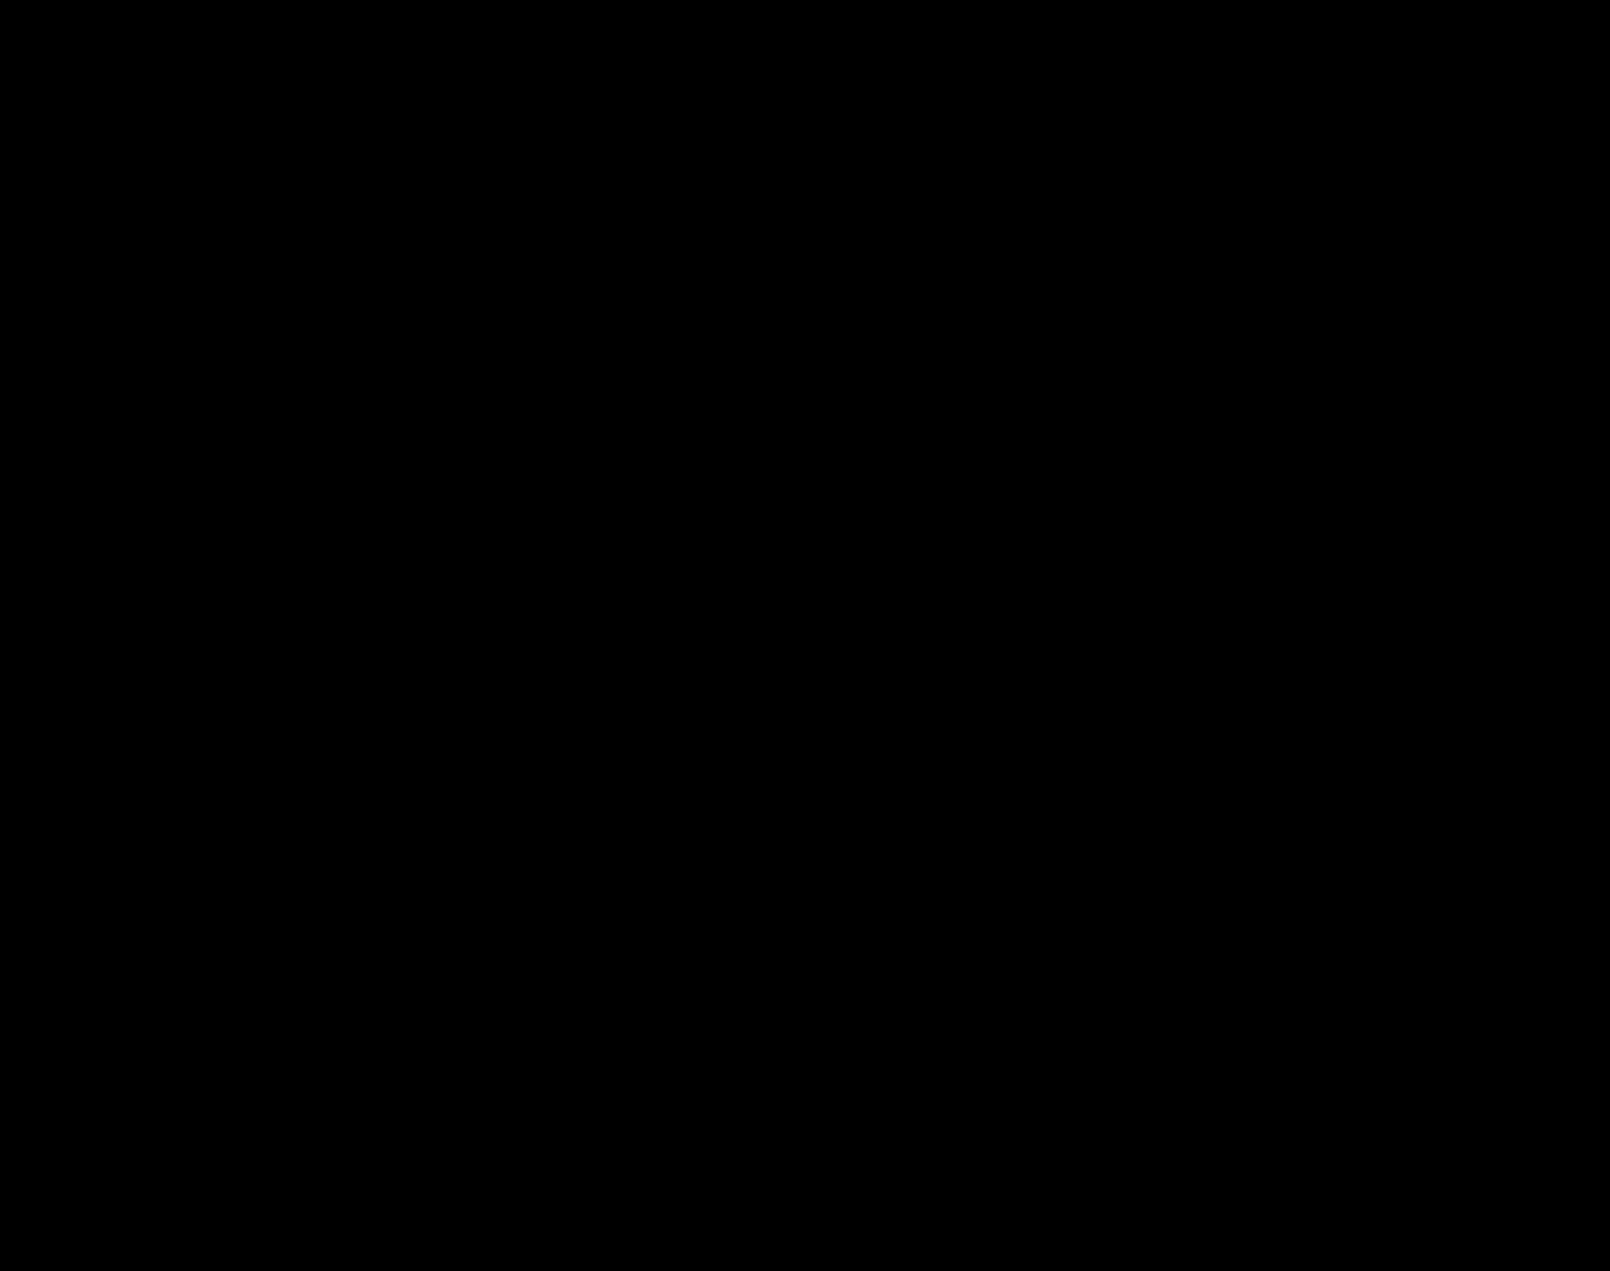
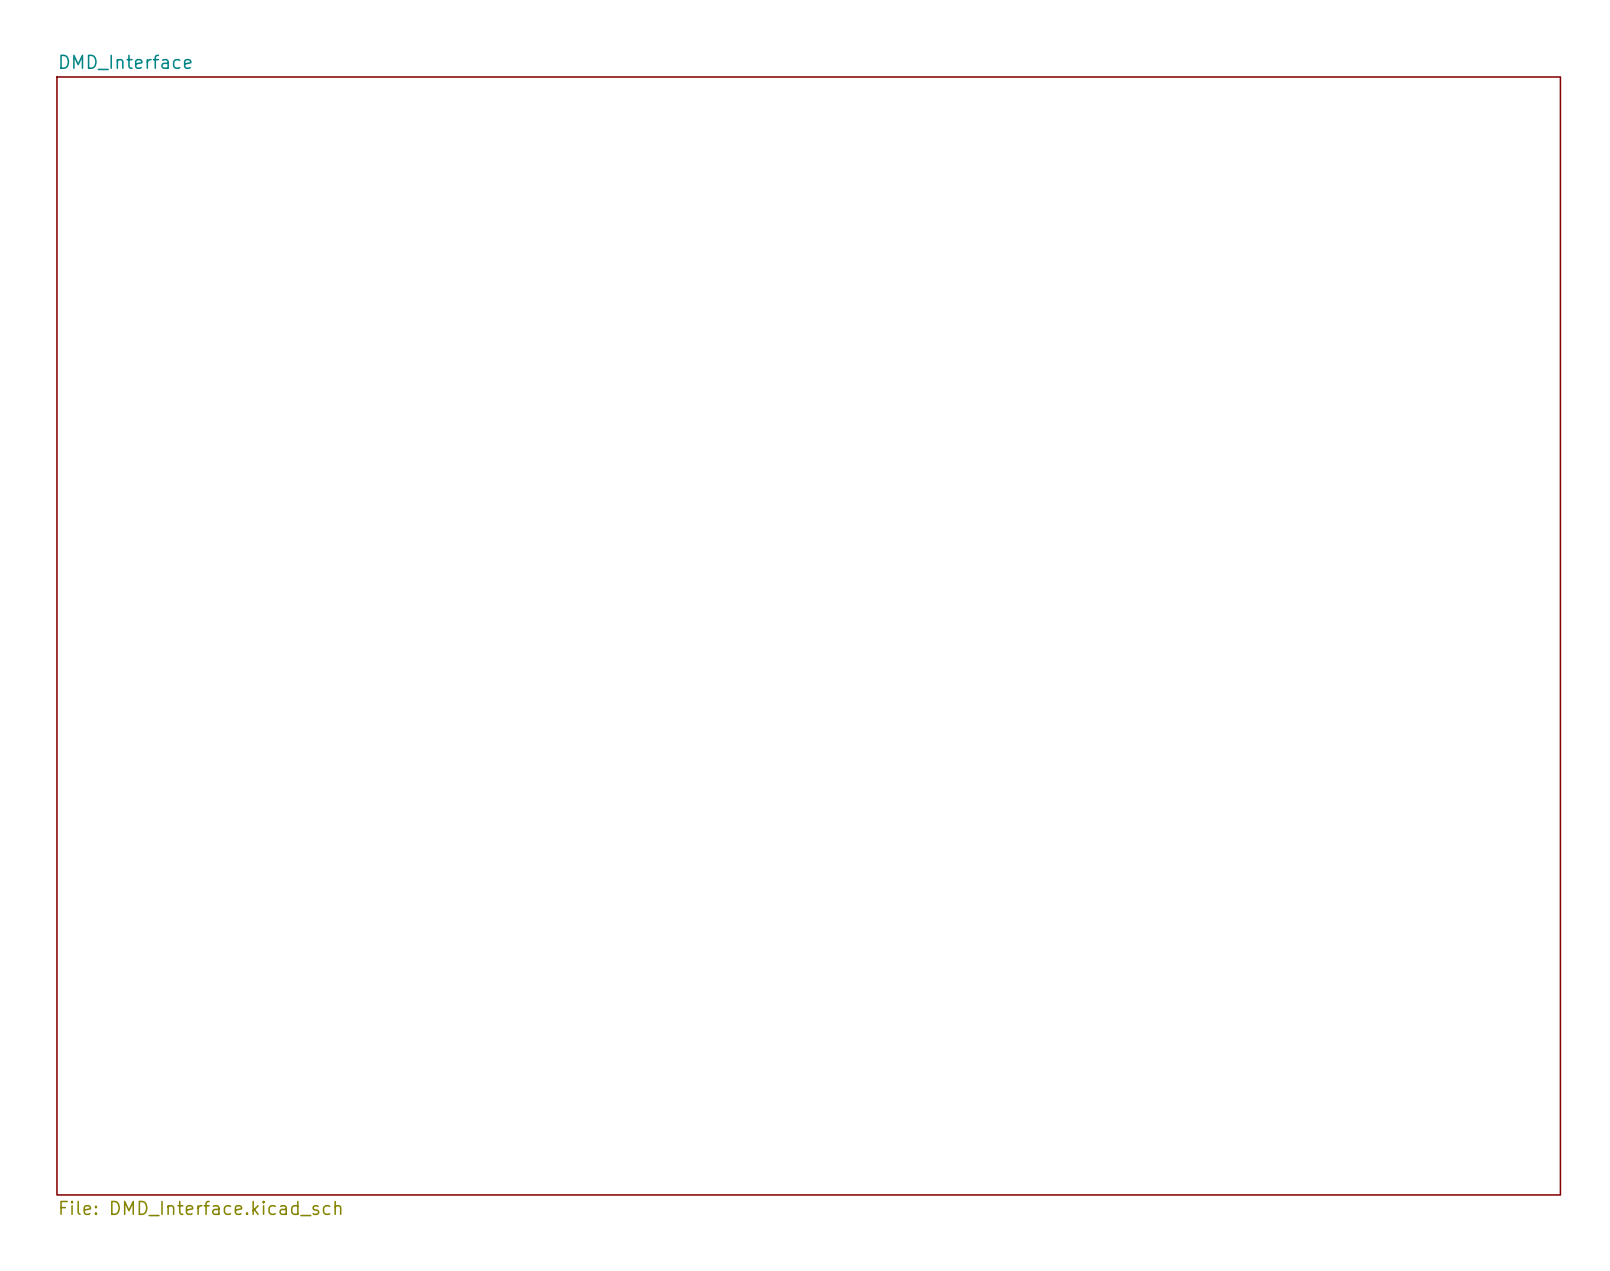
sheet DMD_Interface: none -> File: DMD_Interface.kicad_sch (808, 635)

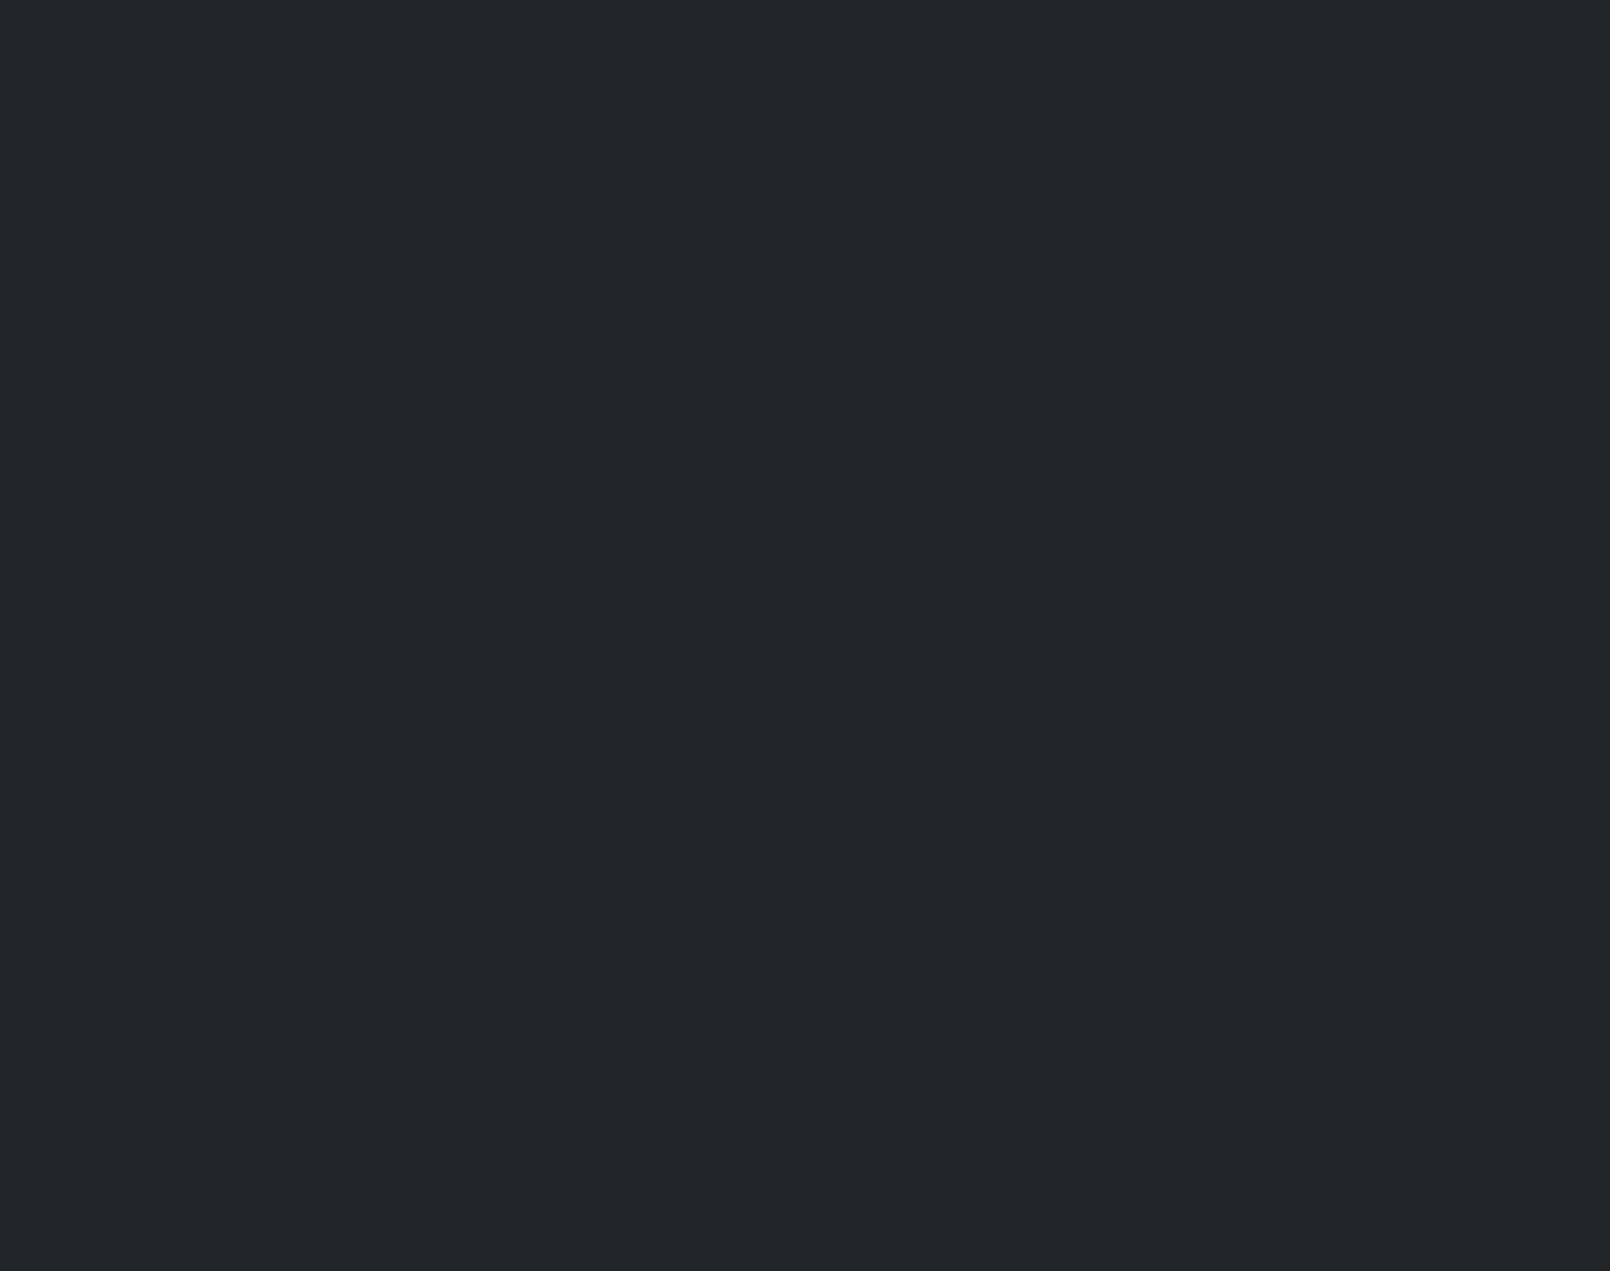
sheet DMD_Interface: File: DMD_Interface.kicad_sch (808, 635) -> none

